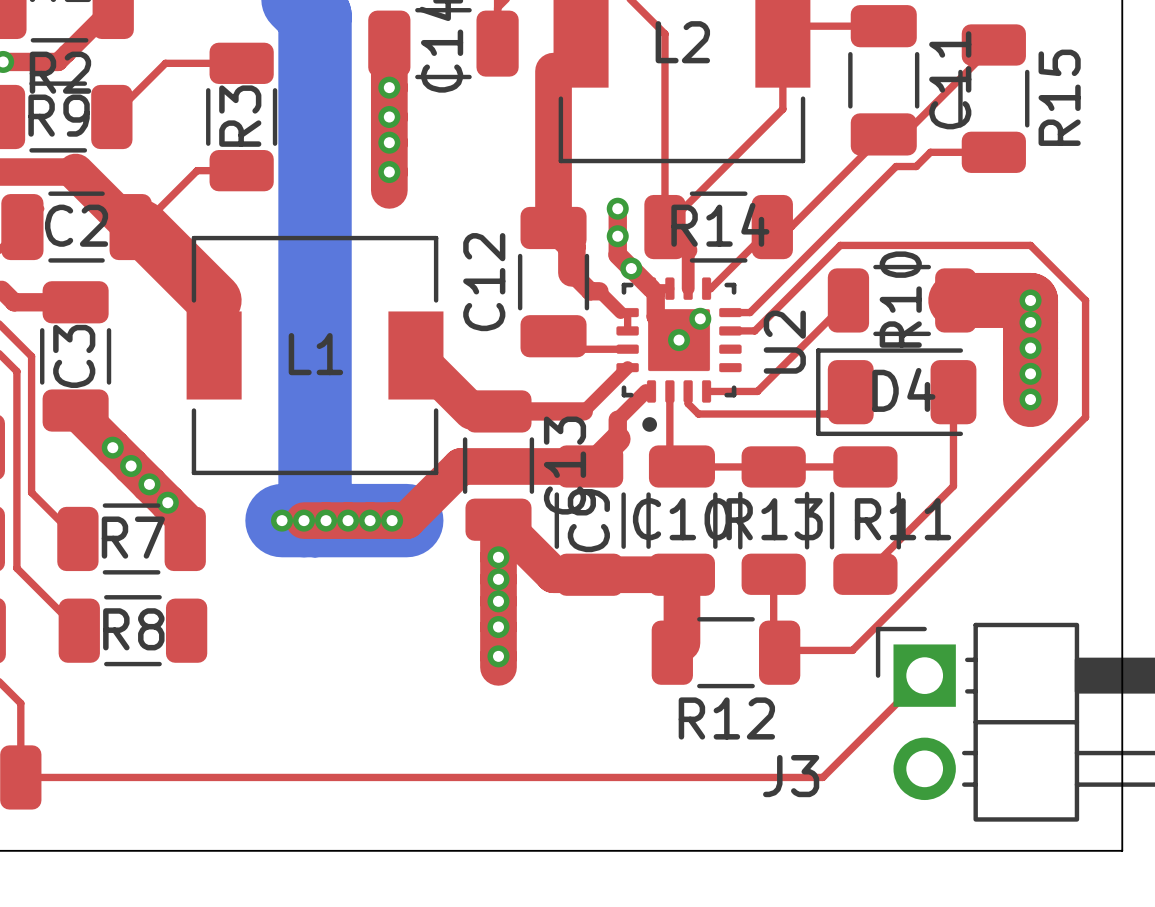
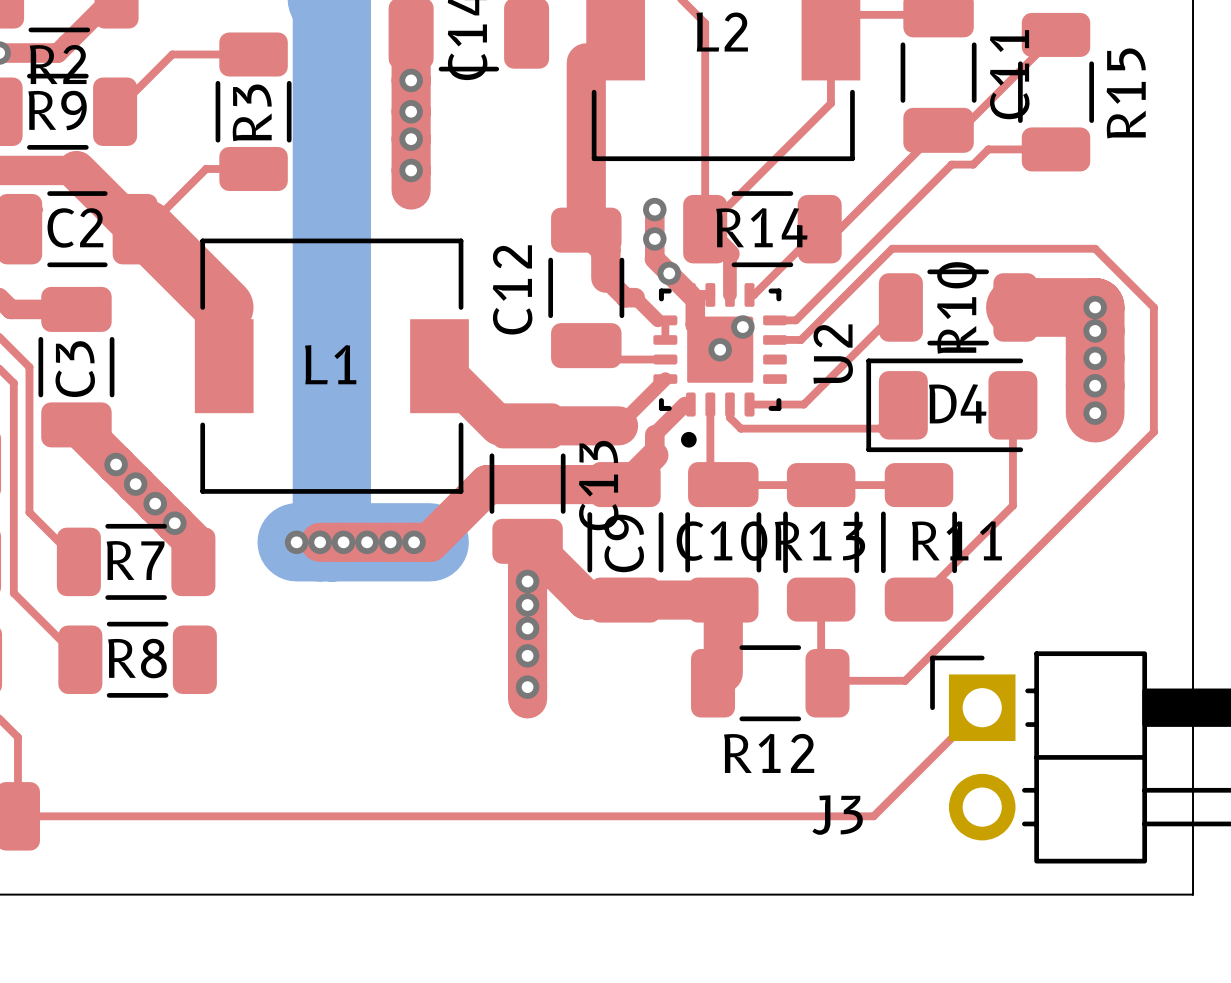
top track width: thin (498, 411) (583, 411) -> thick (527, 425) (618, 425)

